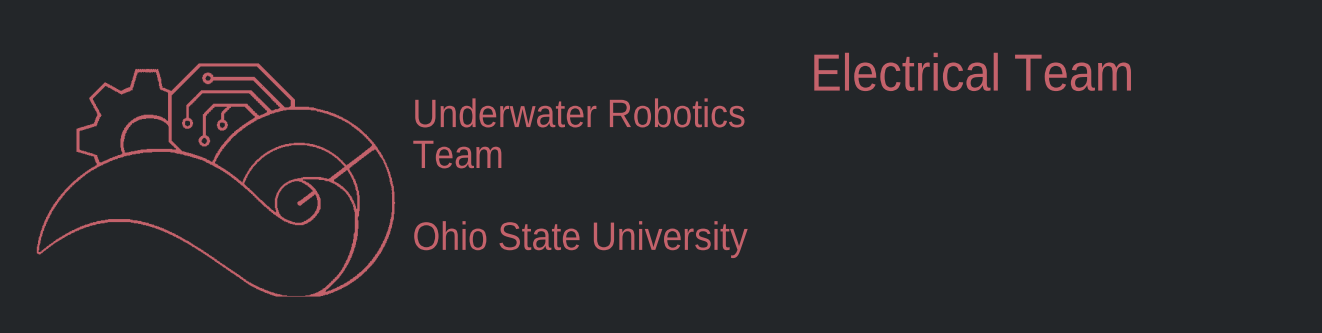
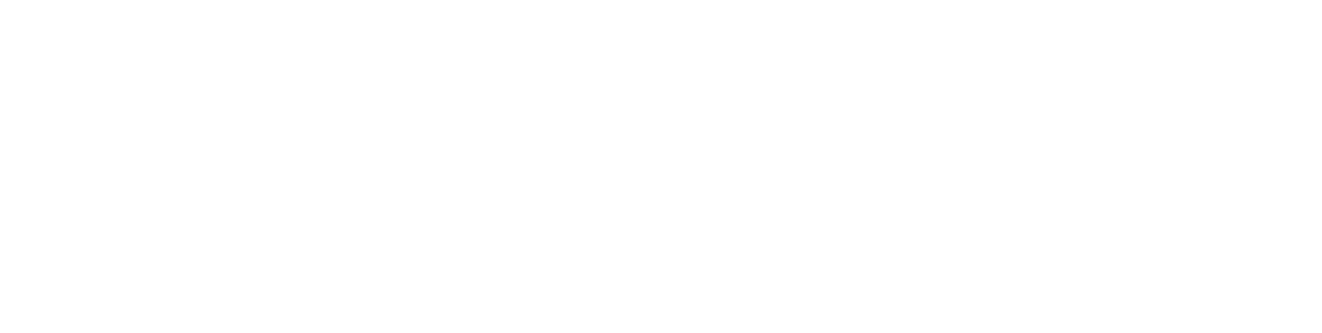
drawing: [36, 63, 396, 297] -> none
text: Electrical Team (972, 71) -> none
text: Underwater Robotics (579, 112) -> none
text: Team (457, 154) -> none
text: Ohio State University (580, 239) -> none

